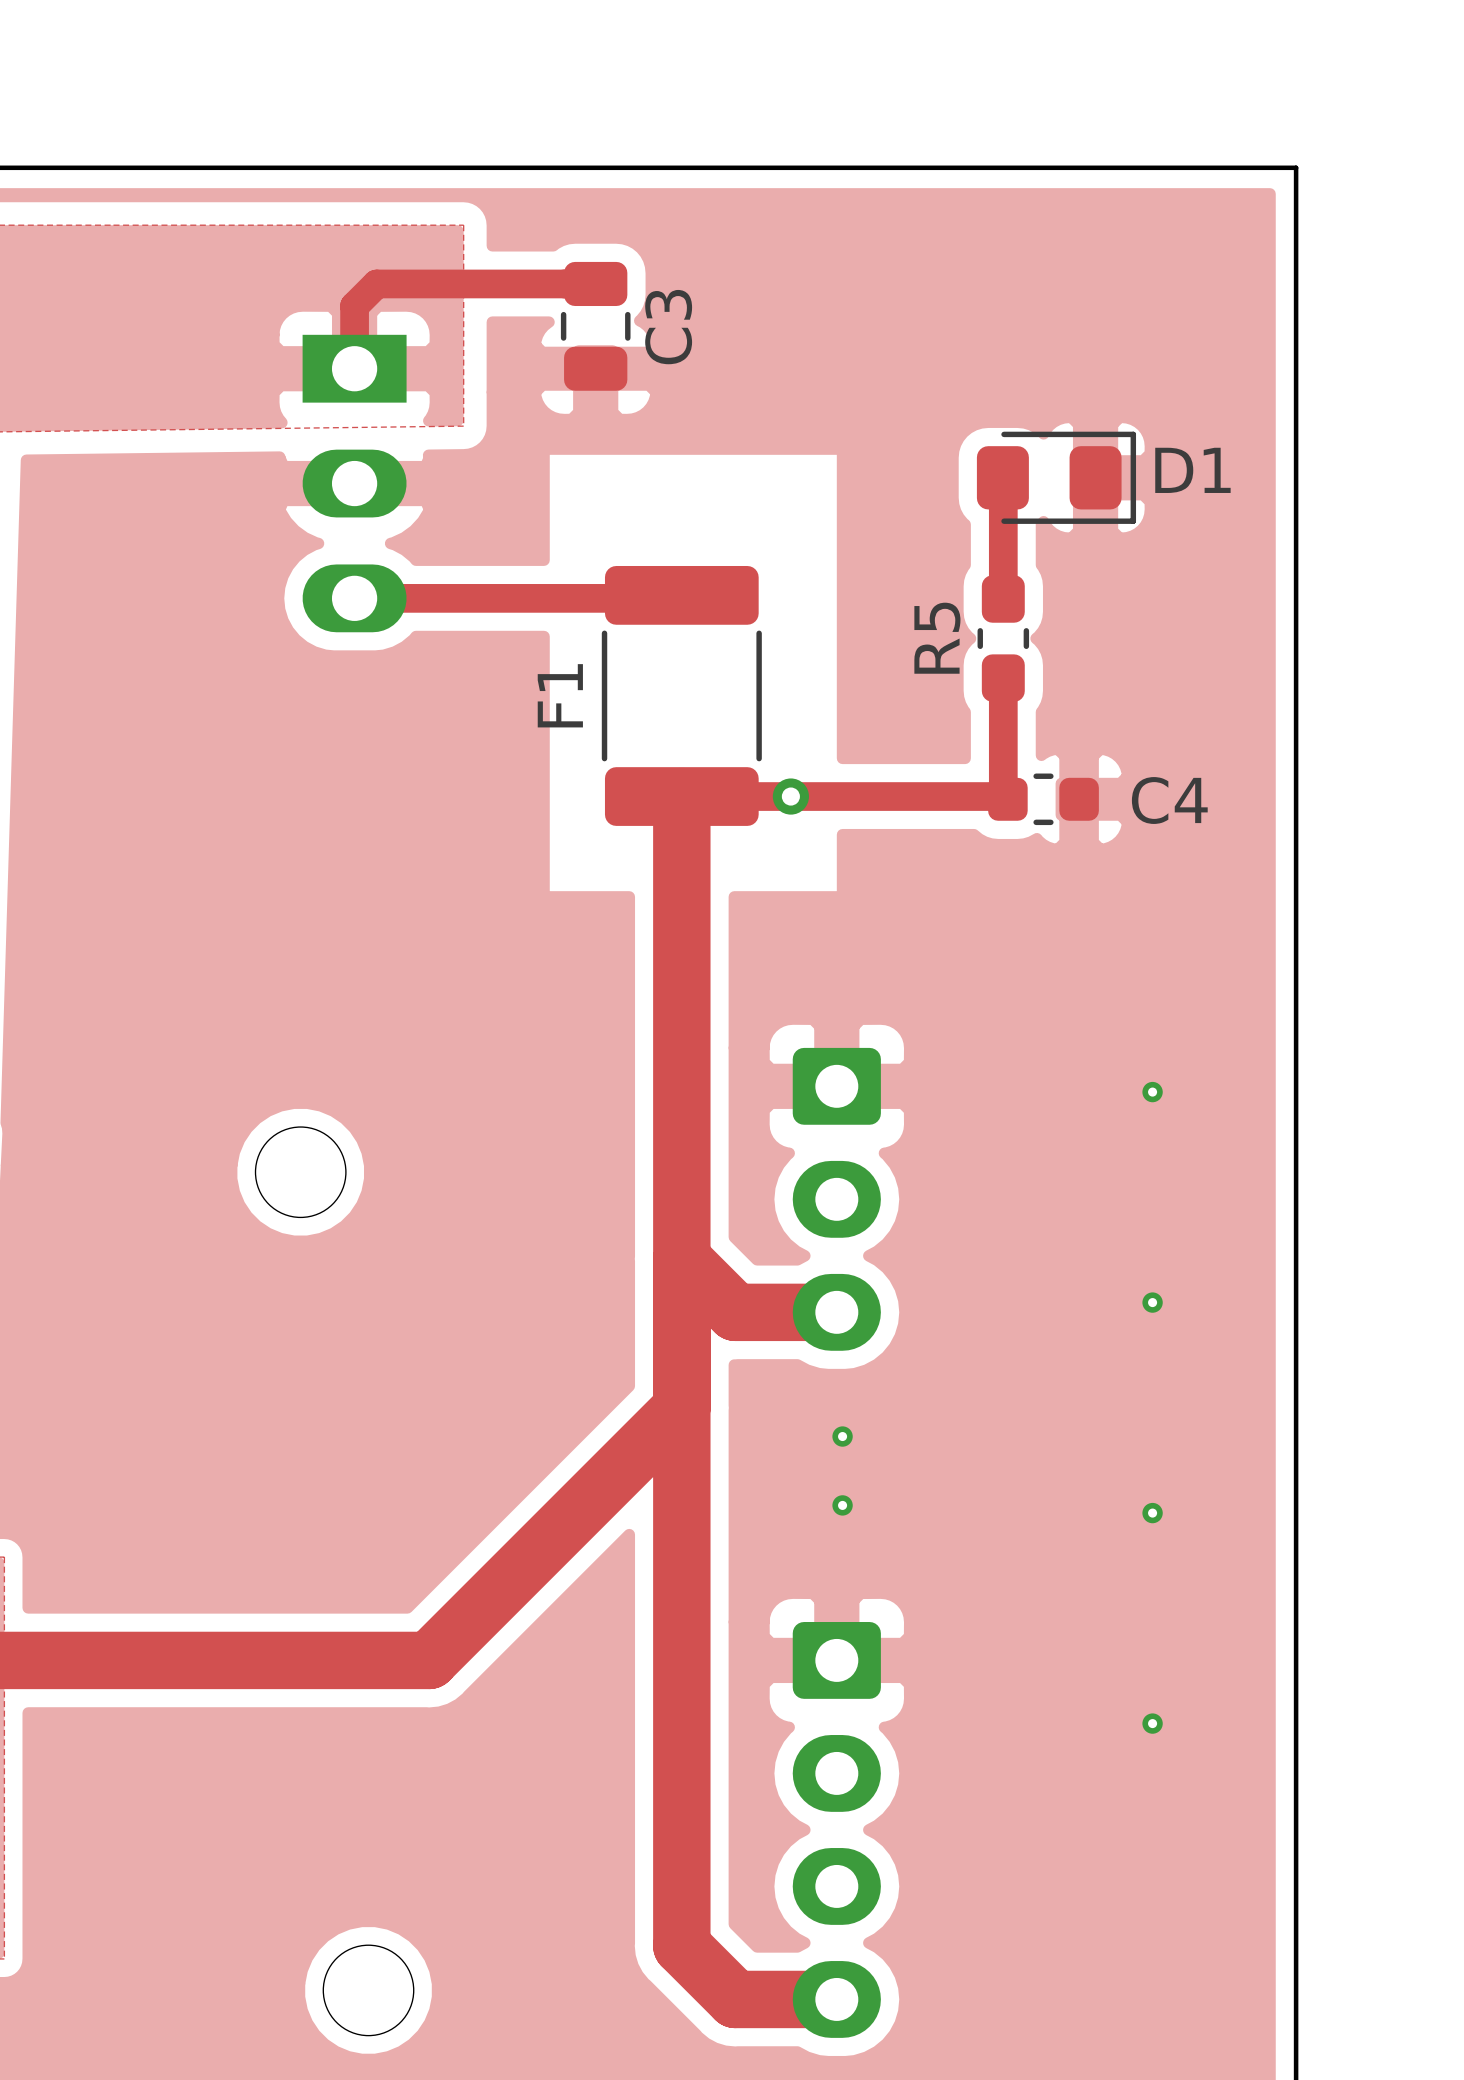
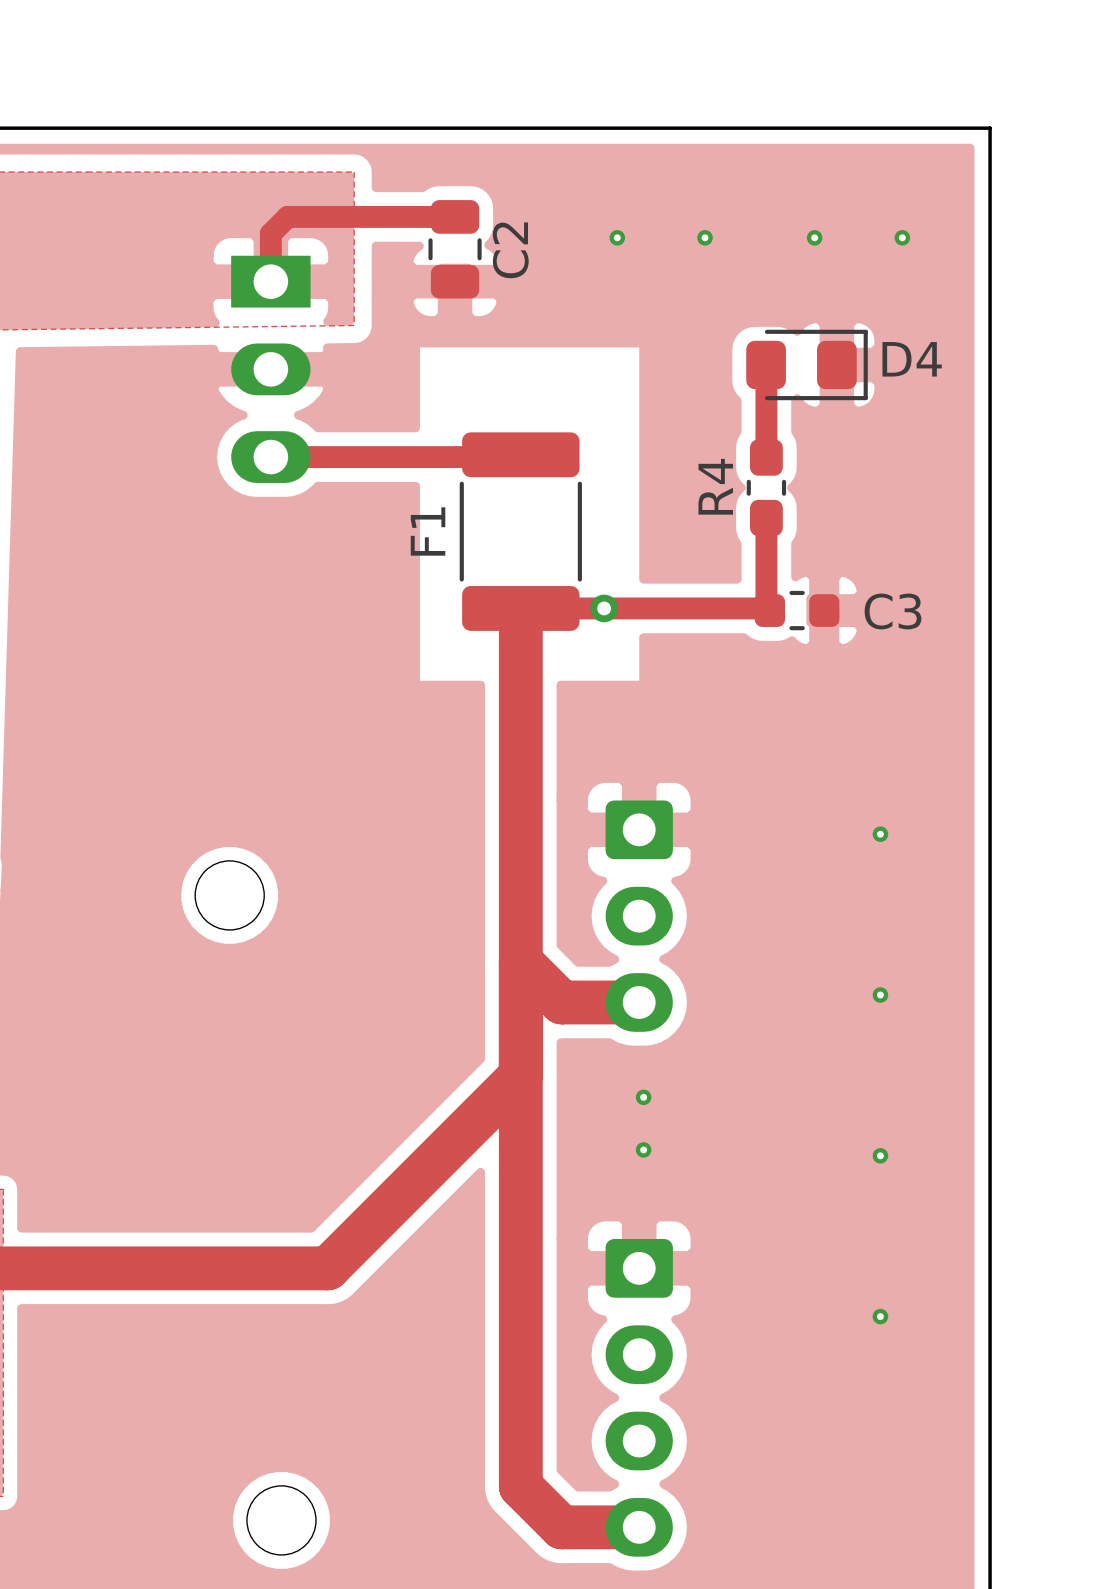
via: none -> (617, 237)
via: none -> (705, 237)
via: none -> (814, 237)
via: none -> (902, 237)
C3 name: C3 (668, 327) -> C2 (510, 250)
D1 name: D1 (1192, 470) -> D4 (912, 359)
R5 name: R5 (937, 638) -> R4 (715, 486)
C4 name: C4 (1169, 800) -> C3 (893, 611)

